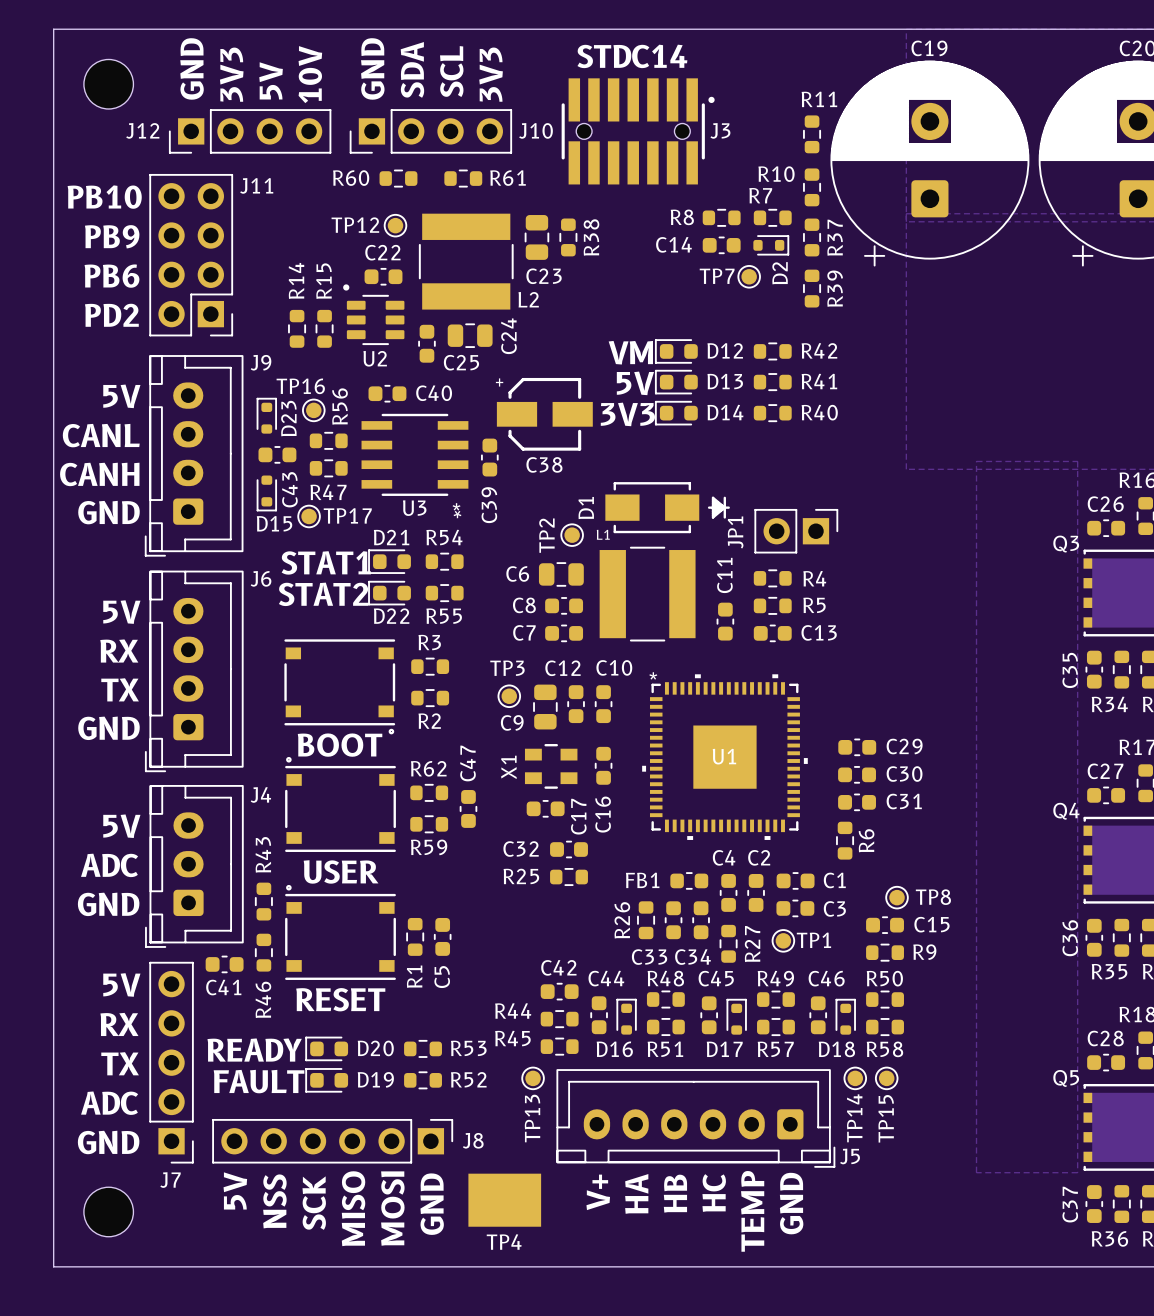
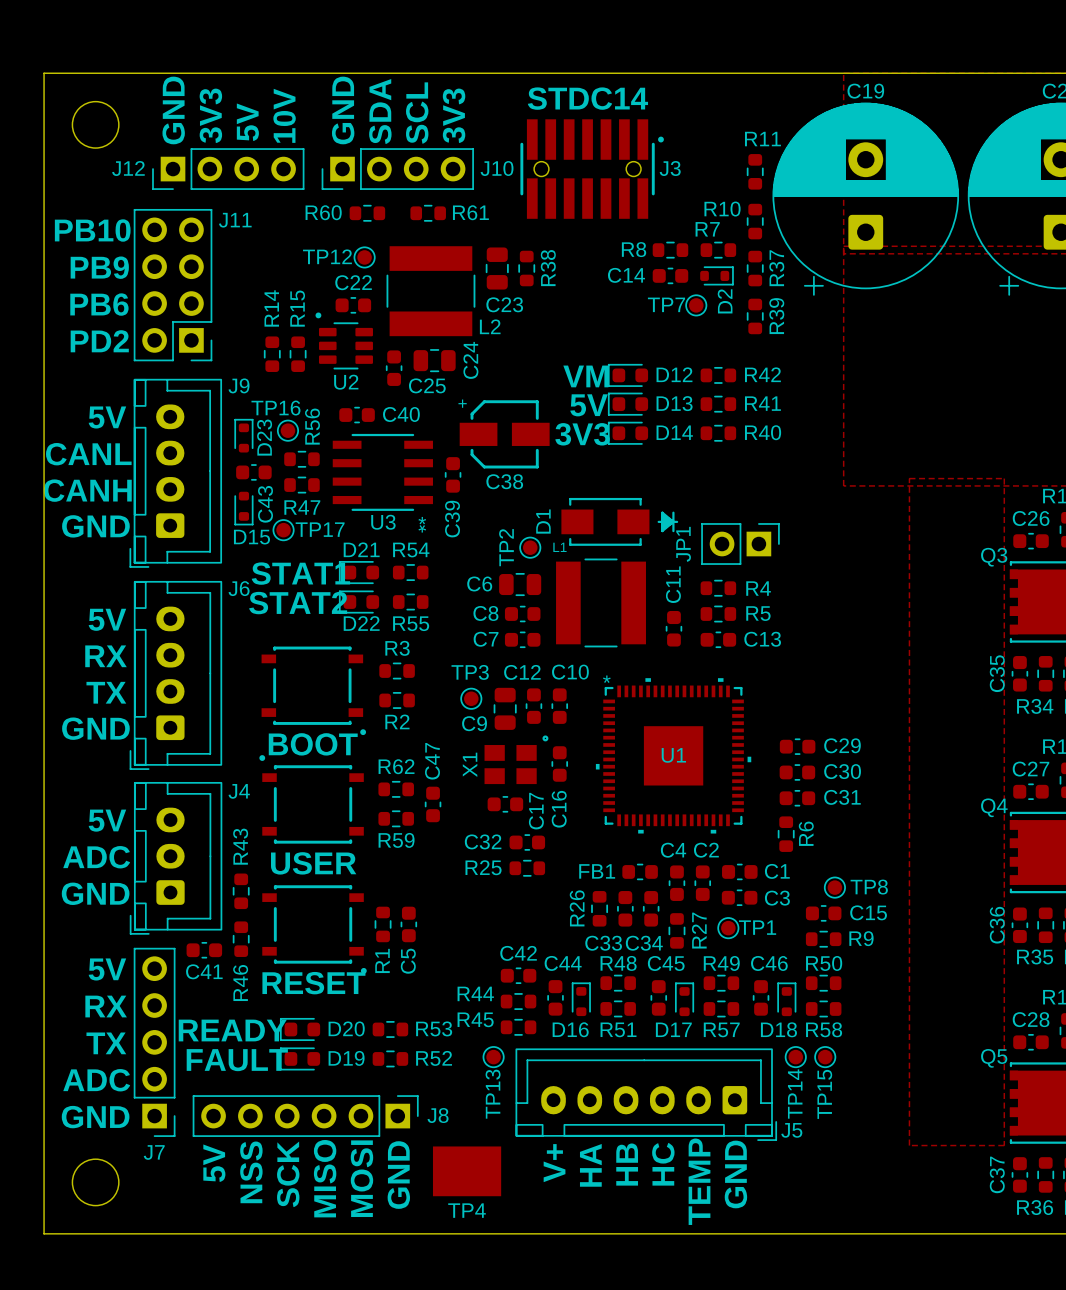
part footprint: [284, 639, 396, 735] -> [261, 646, 367, 736]
X1 footprint: [524, 744, 578, 789] -> [484, 735, 549, 785]
part footprint: [285, 756, 396, 852] -> [259, 755, 364, 844]
part footprint: [285, 884, 396, 980] -> [262, 885, 367, 974]

